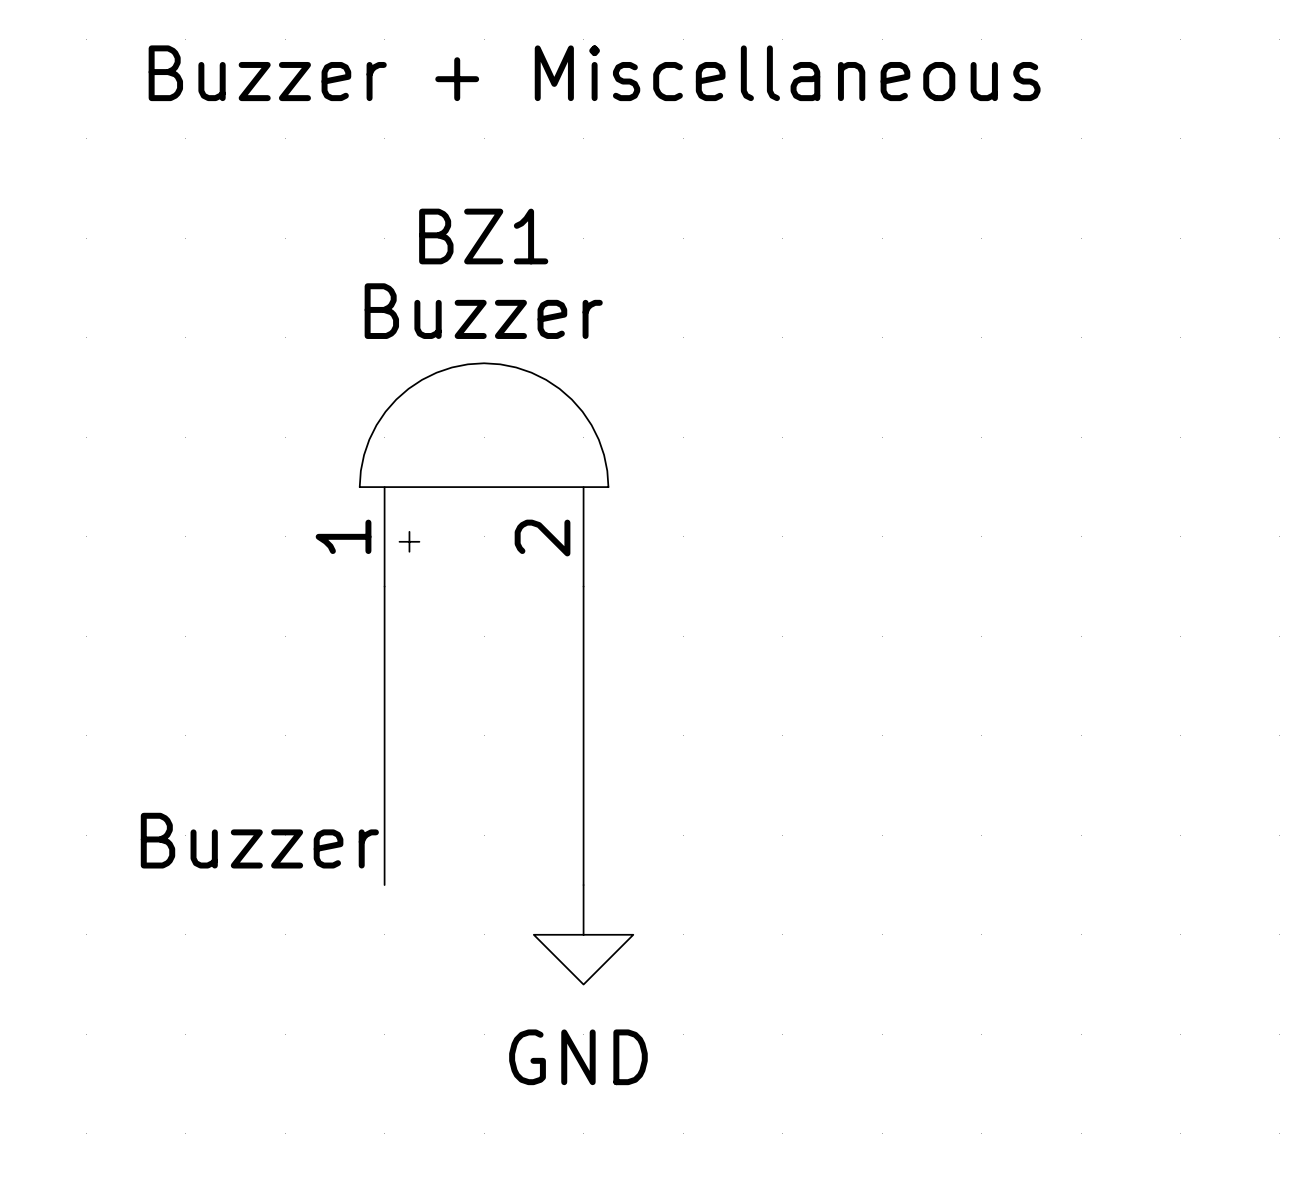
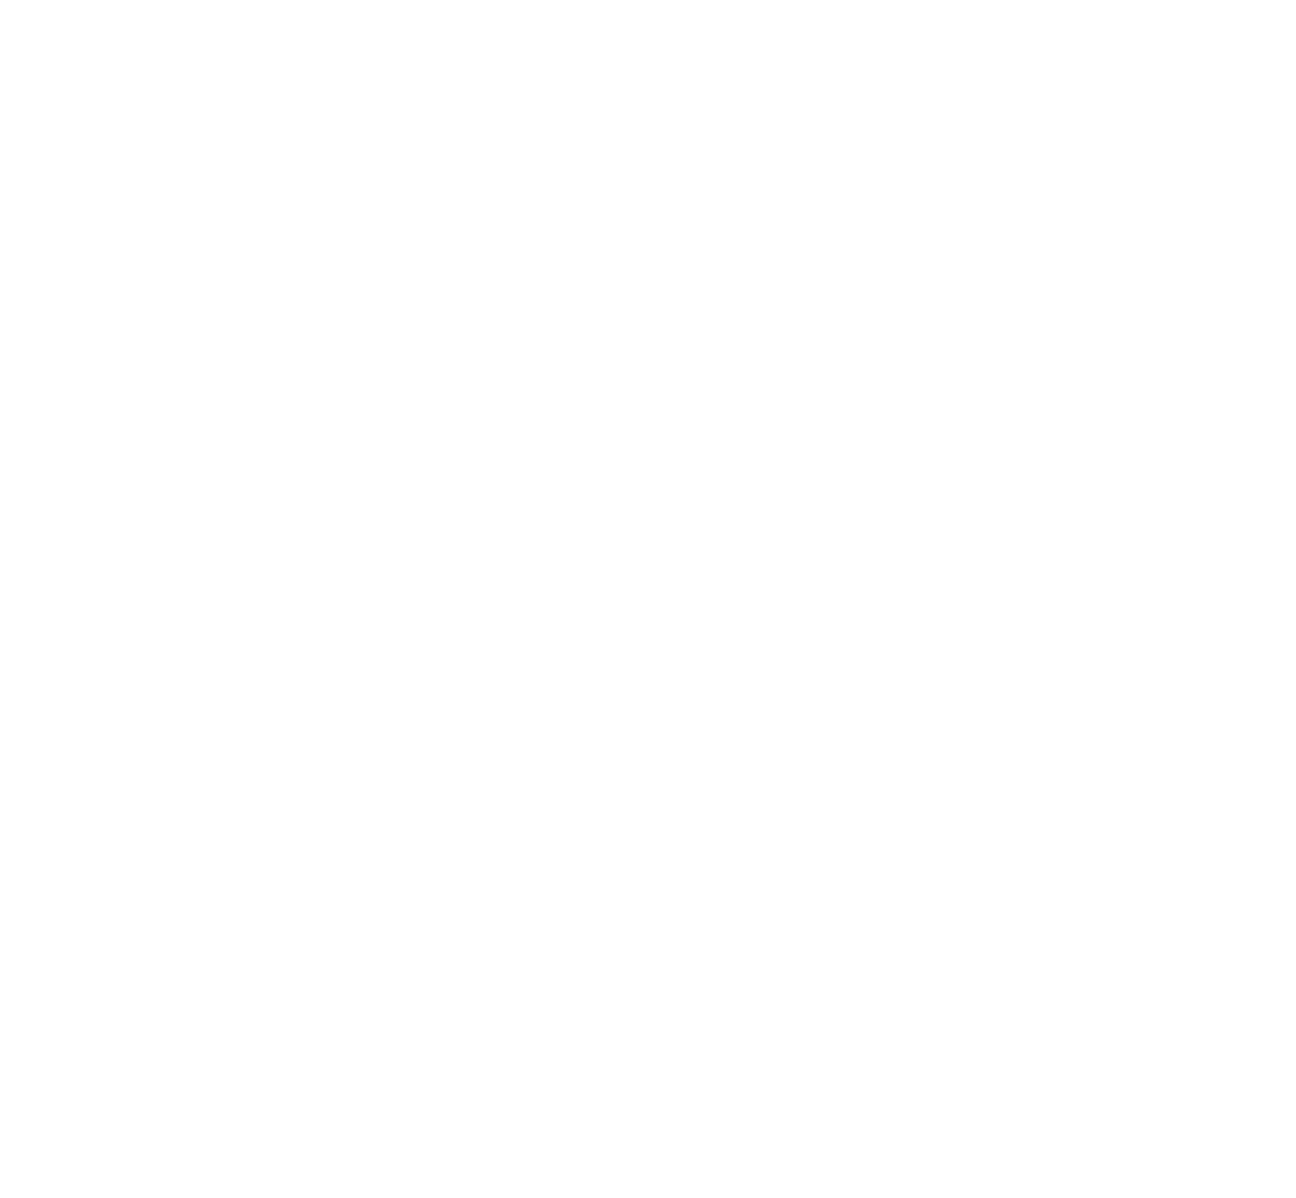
text: Buzzer + Miscellaneous (594, 73) -> none
BZ1: Buzzer (484, 474) -> none
wire: (384, 586) (384, 885) -> none
wire: (583, 586) (583, 885) -> none
label: Buzzer (259, 840) -> none
power symbol: GND (583, 934) -> none

